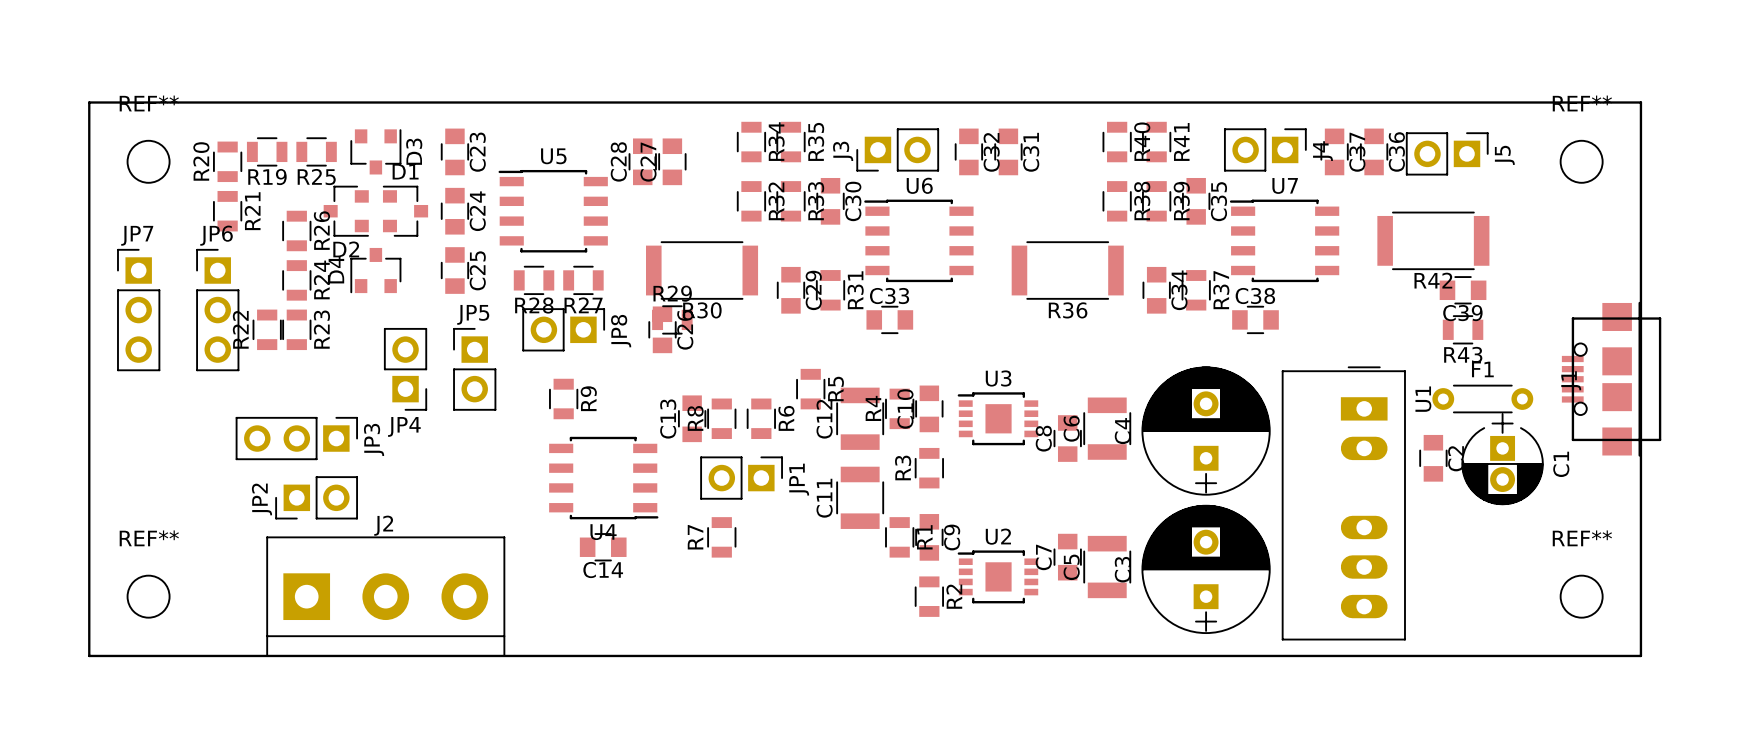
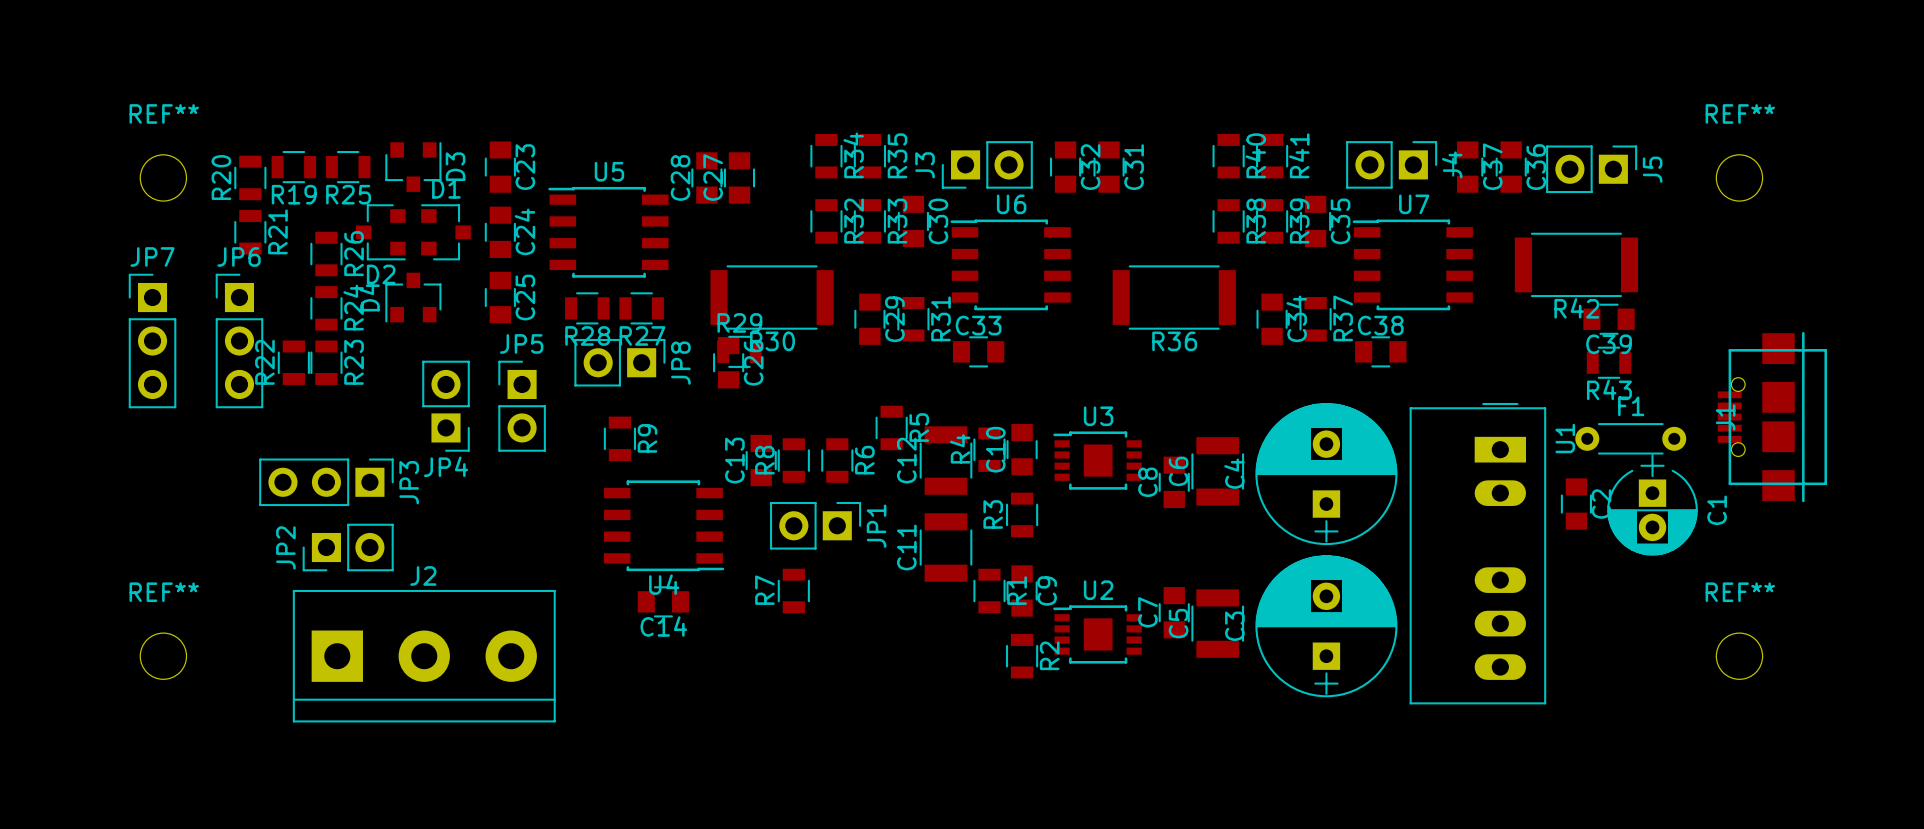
board edge: (89, 102) (89, 655) (1640, 655) (1640, 102) (89, 102) -> none

